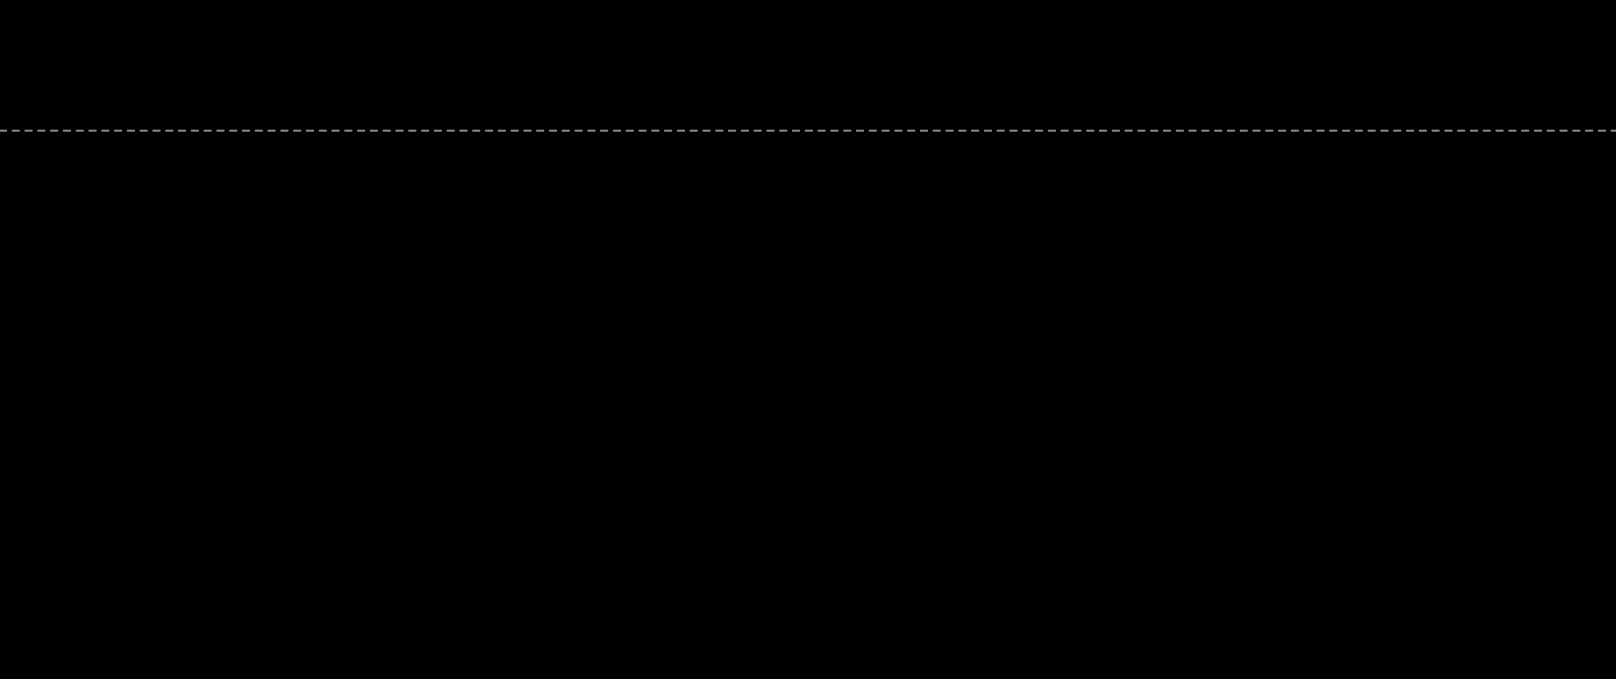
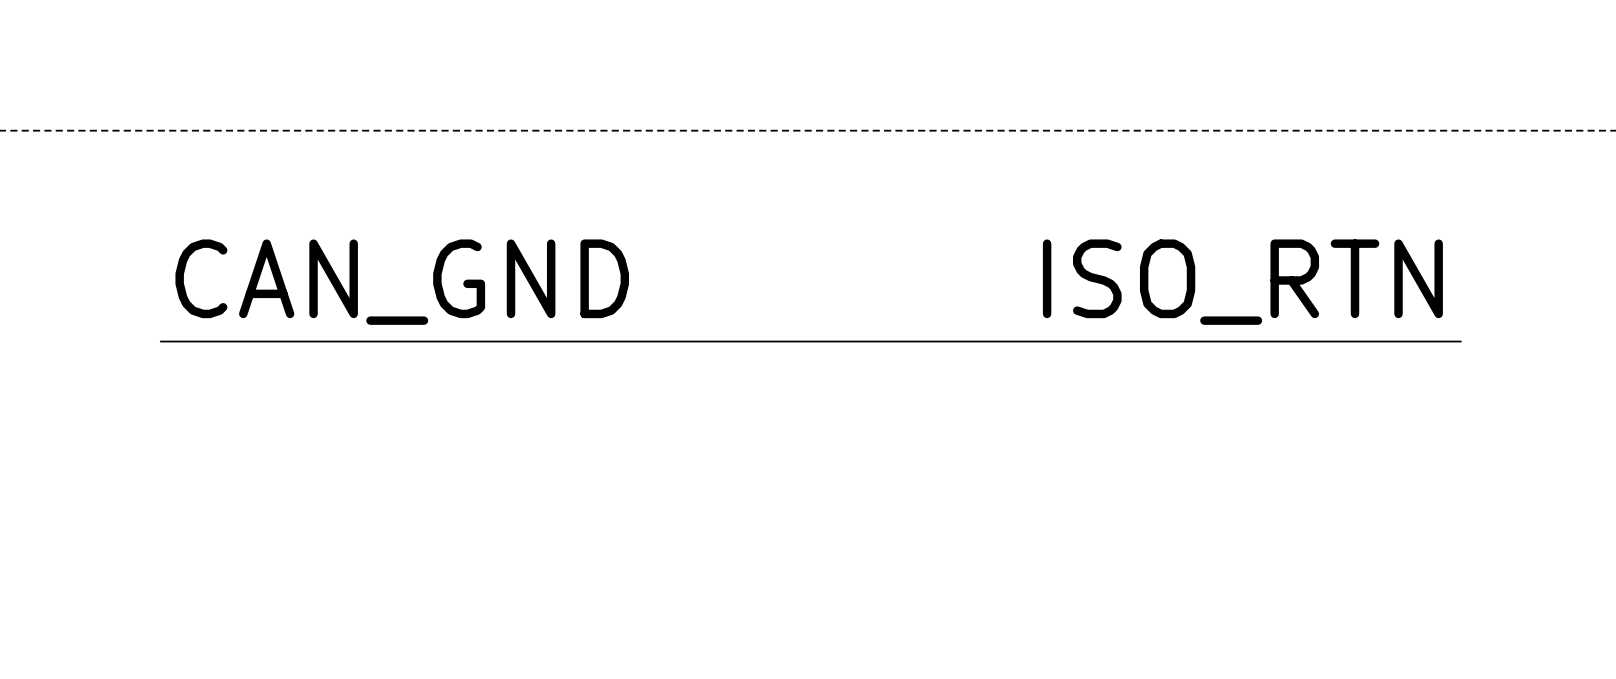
label: none -> CAN_GND (402, 282)
label: none -> ISO_RTN (1242, 282)
wire: none -> (160, 341) (1460, 341)

